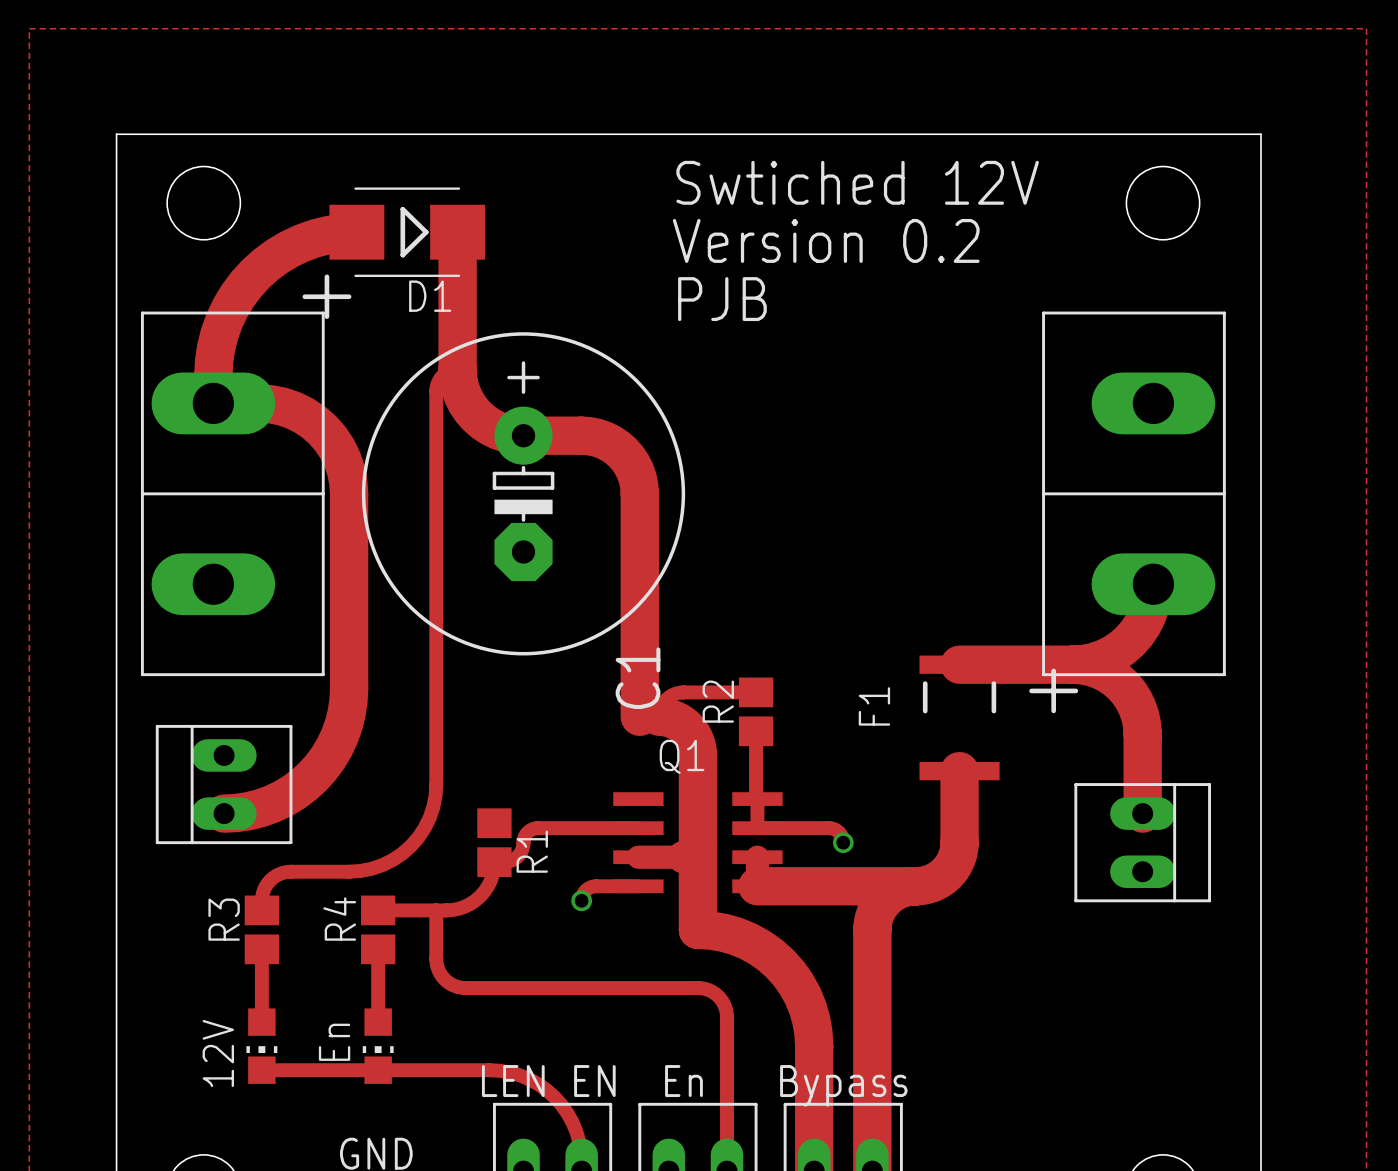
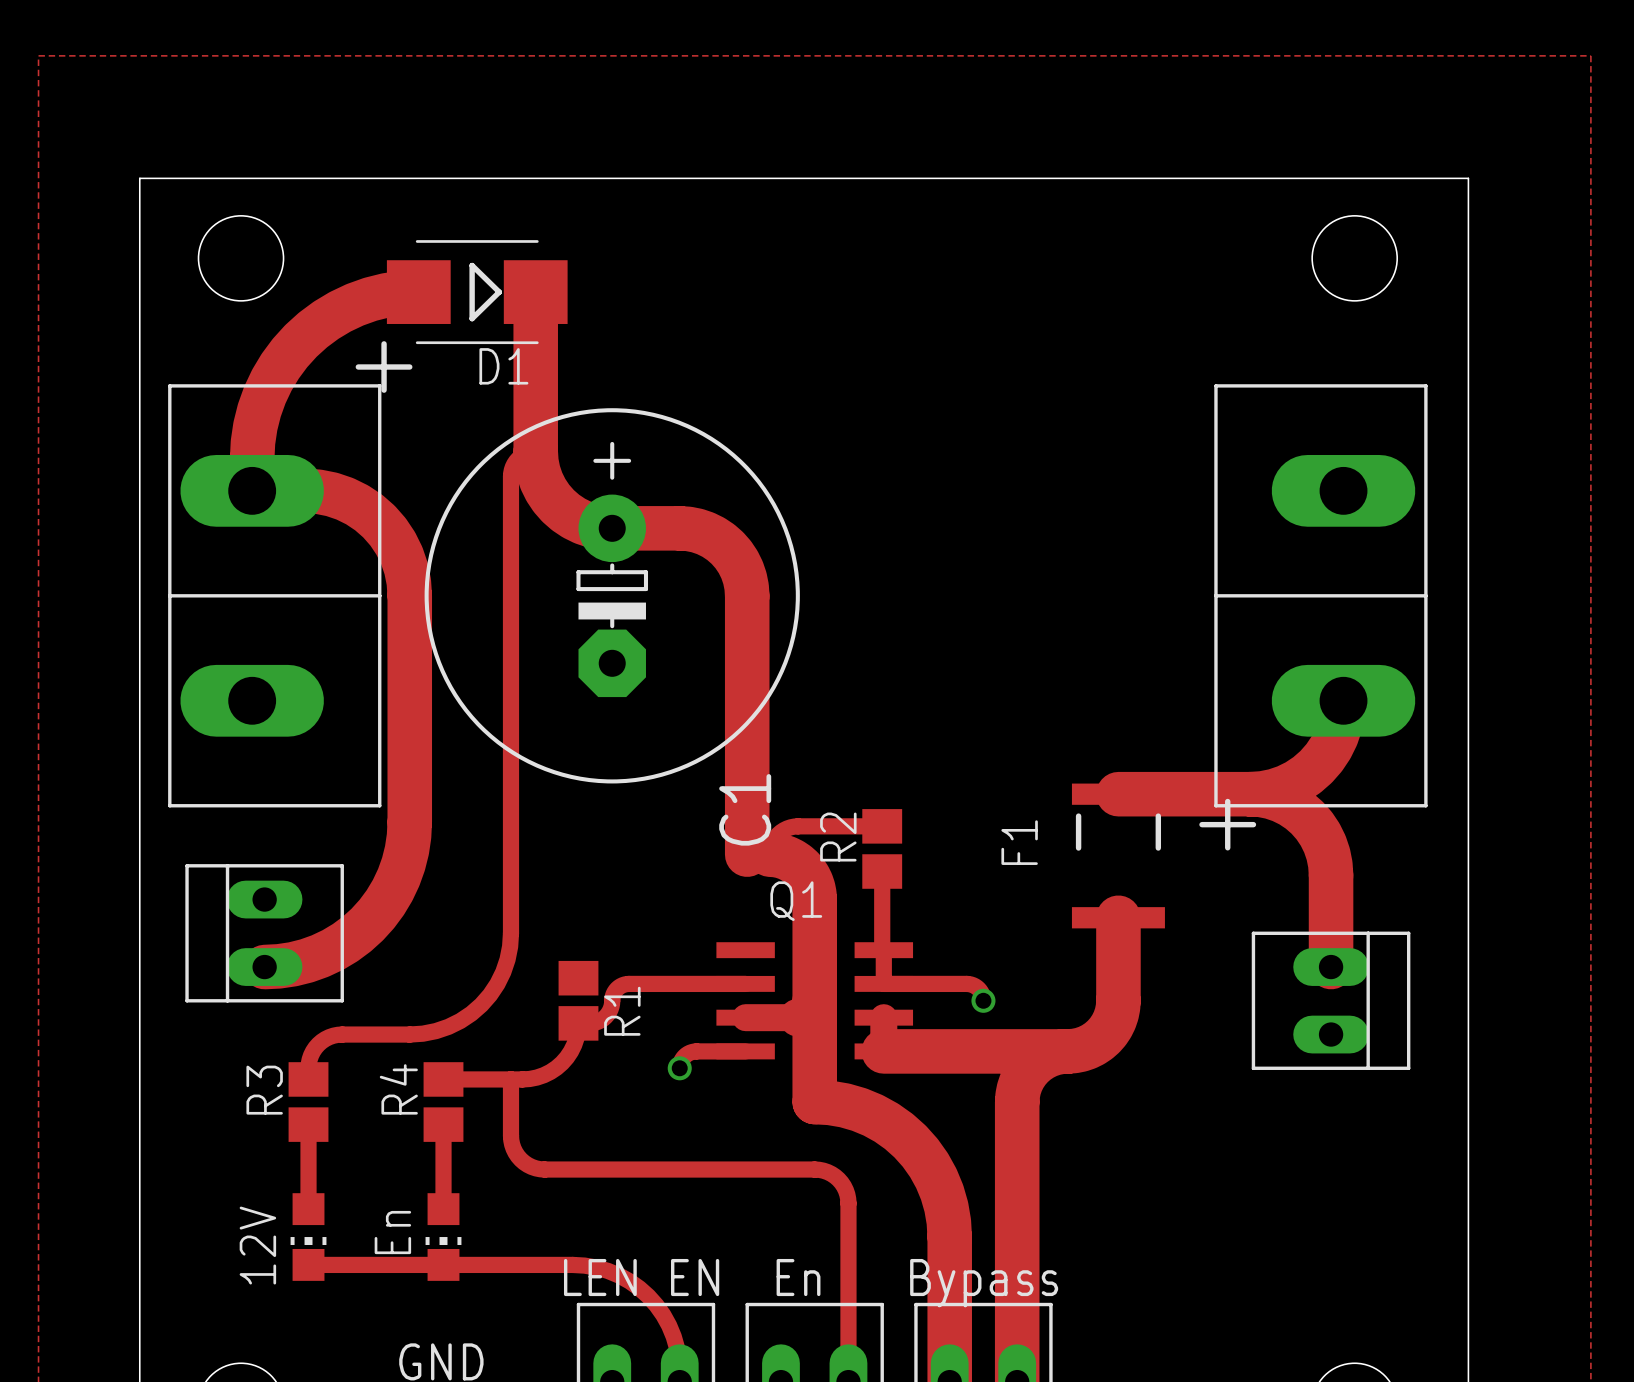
text: Swtiched 12V (857, 182) -> none
text: Version 0.2 (826, 240) -> none
text: PJB (722, 299) -> none

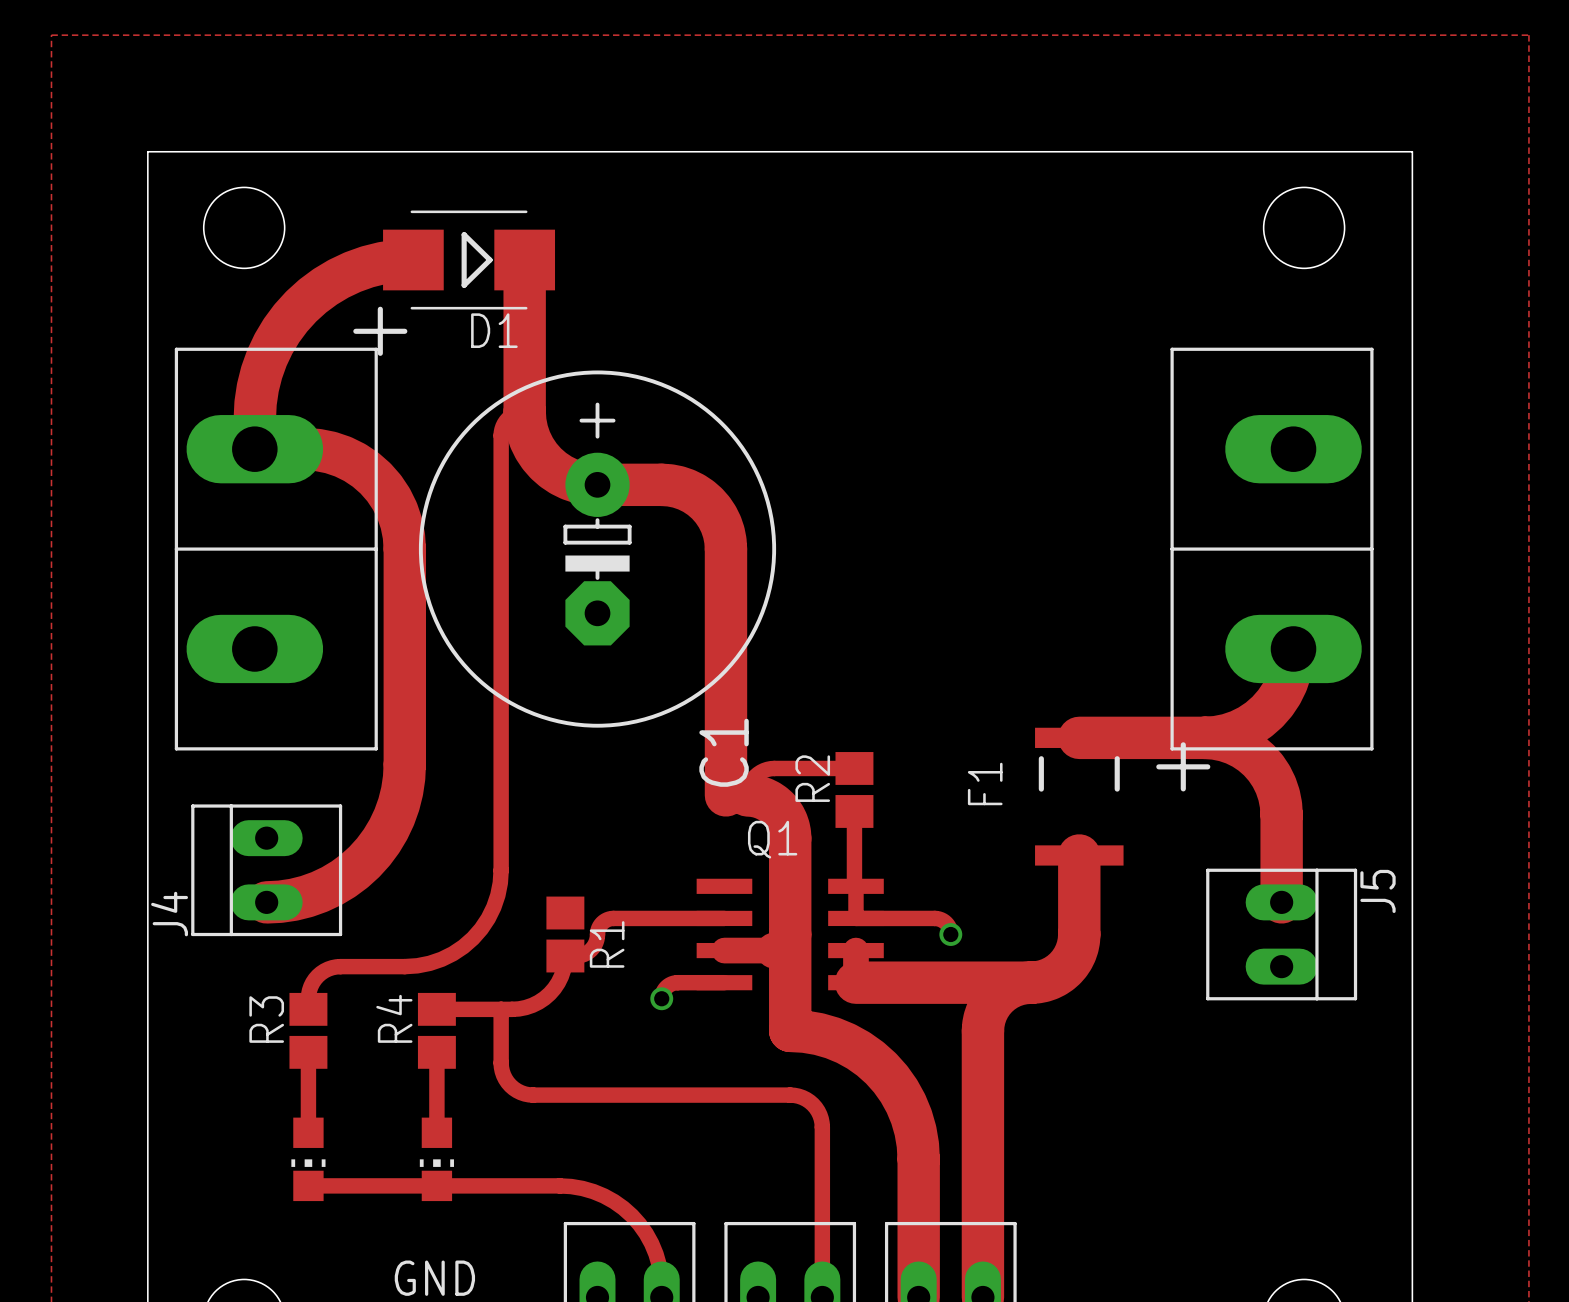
J5 name: none -> J5 (1378, 891)
J4 name: none -> J4 (169, 914)
part value: En (392, 1232) -> none
part value: 12V (257, 1245) -> none
part value: LEN EN (641, 1277) -> none
part value: En (798, 1277) -> none
part value: Bypass (984, 1283) -> none

